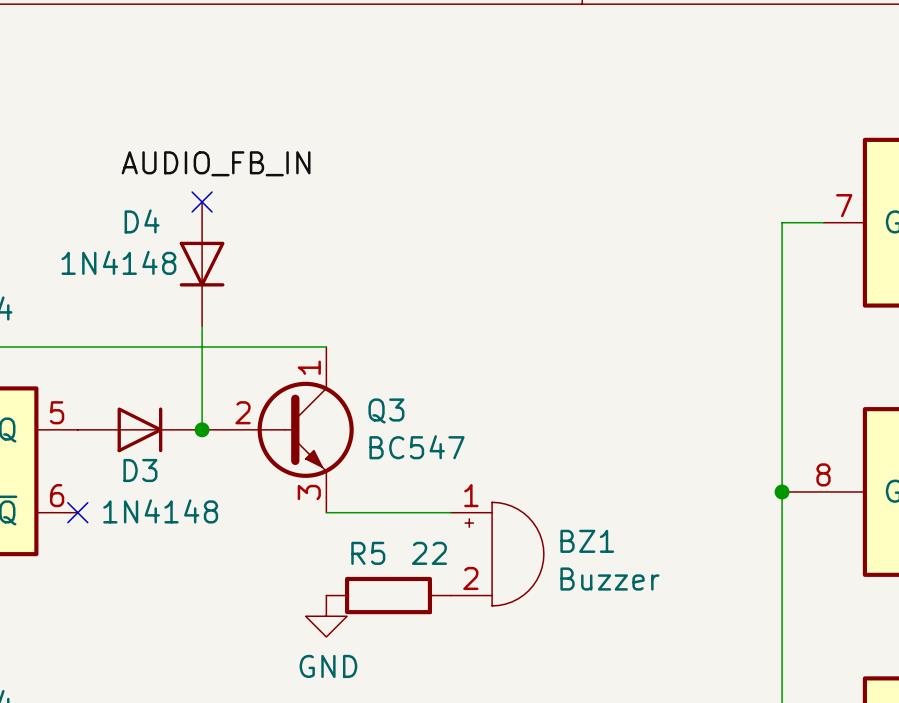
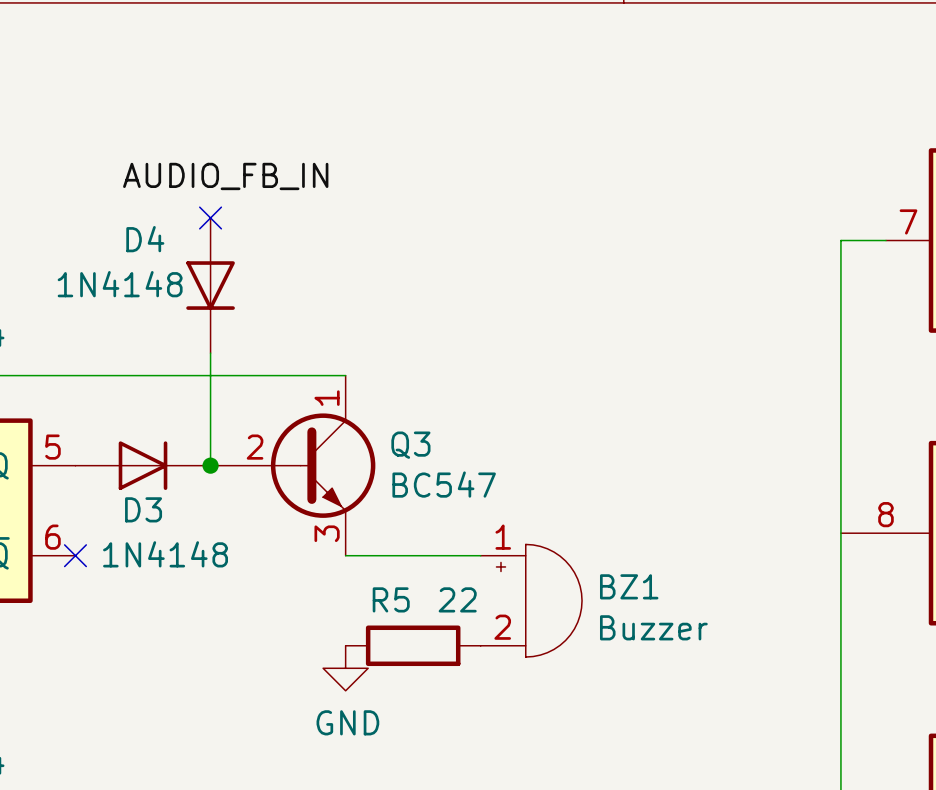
junction: (782, 491) -> none

